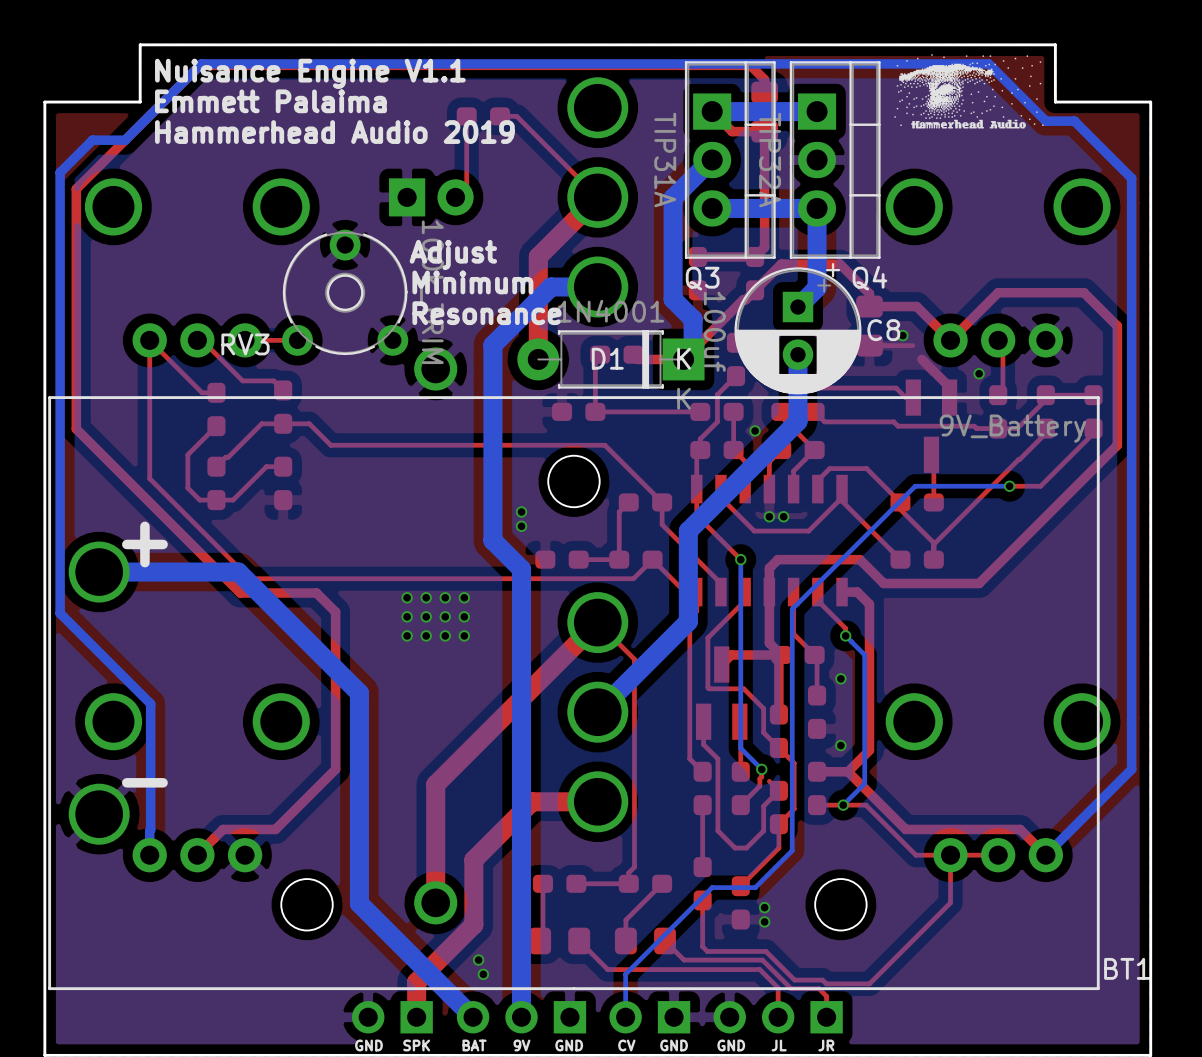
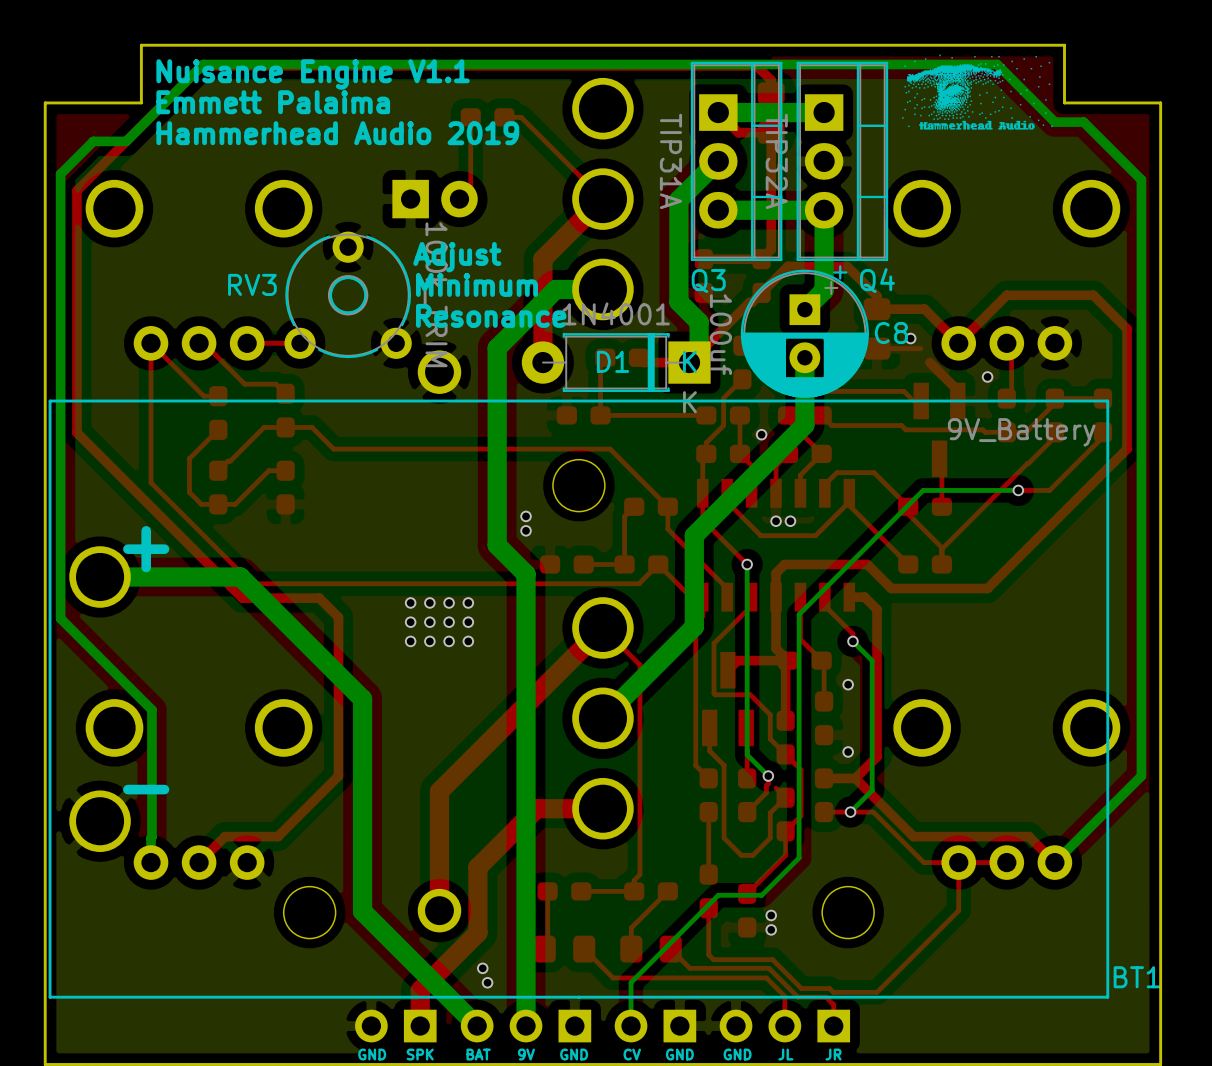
RV3 name position: RV3 (245, 344) -> RV3 (252, 284)

